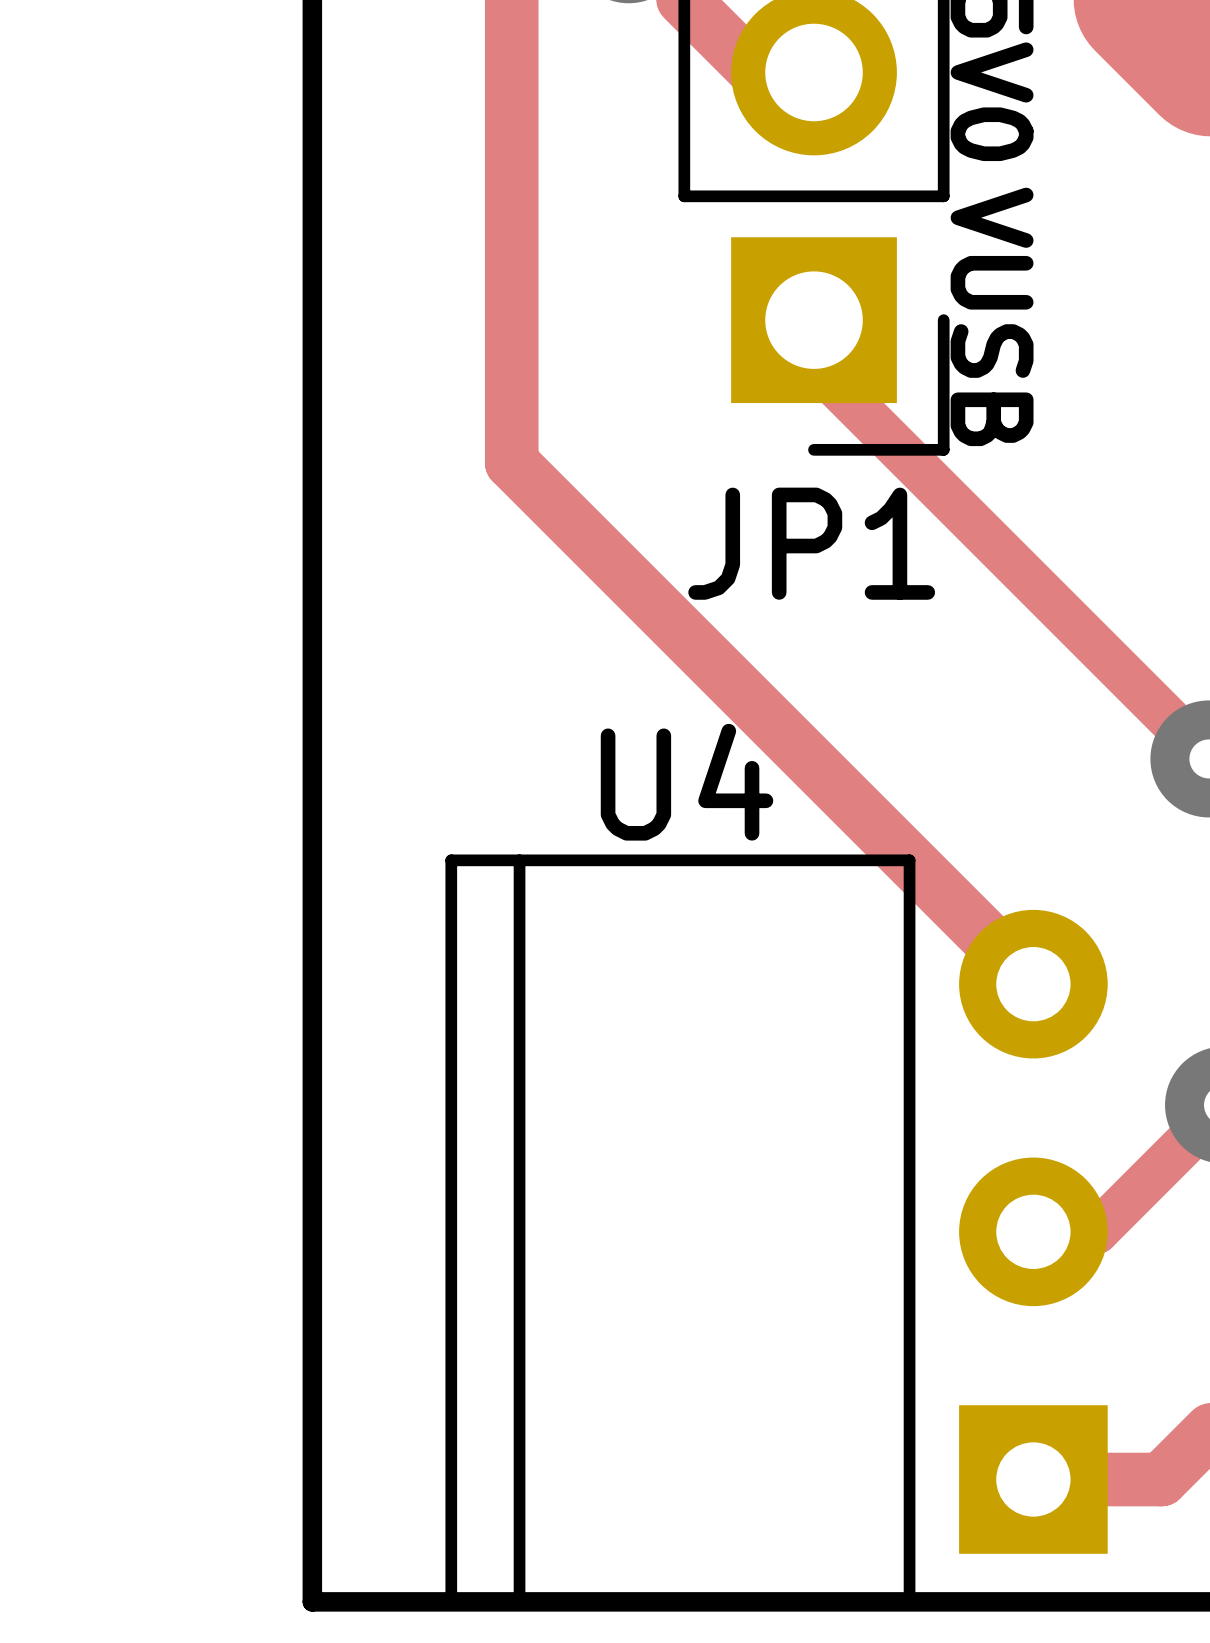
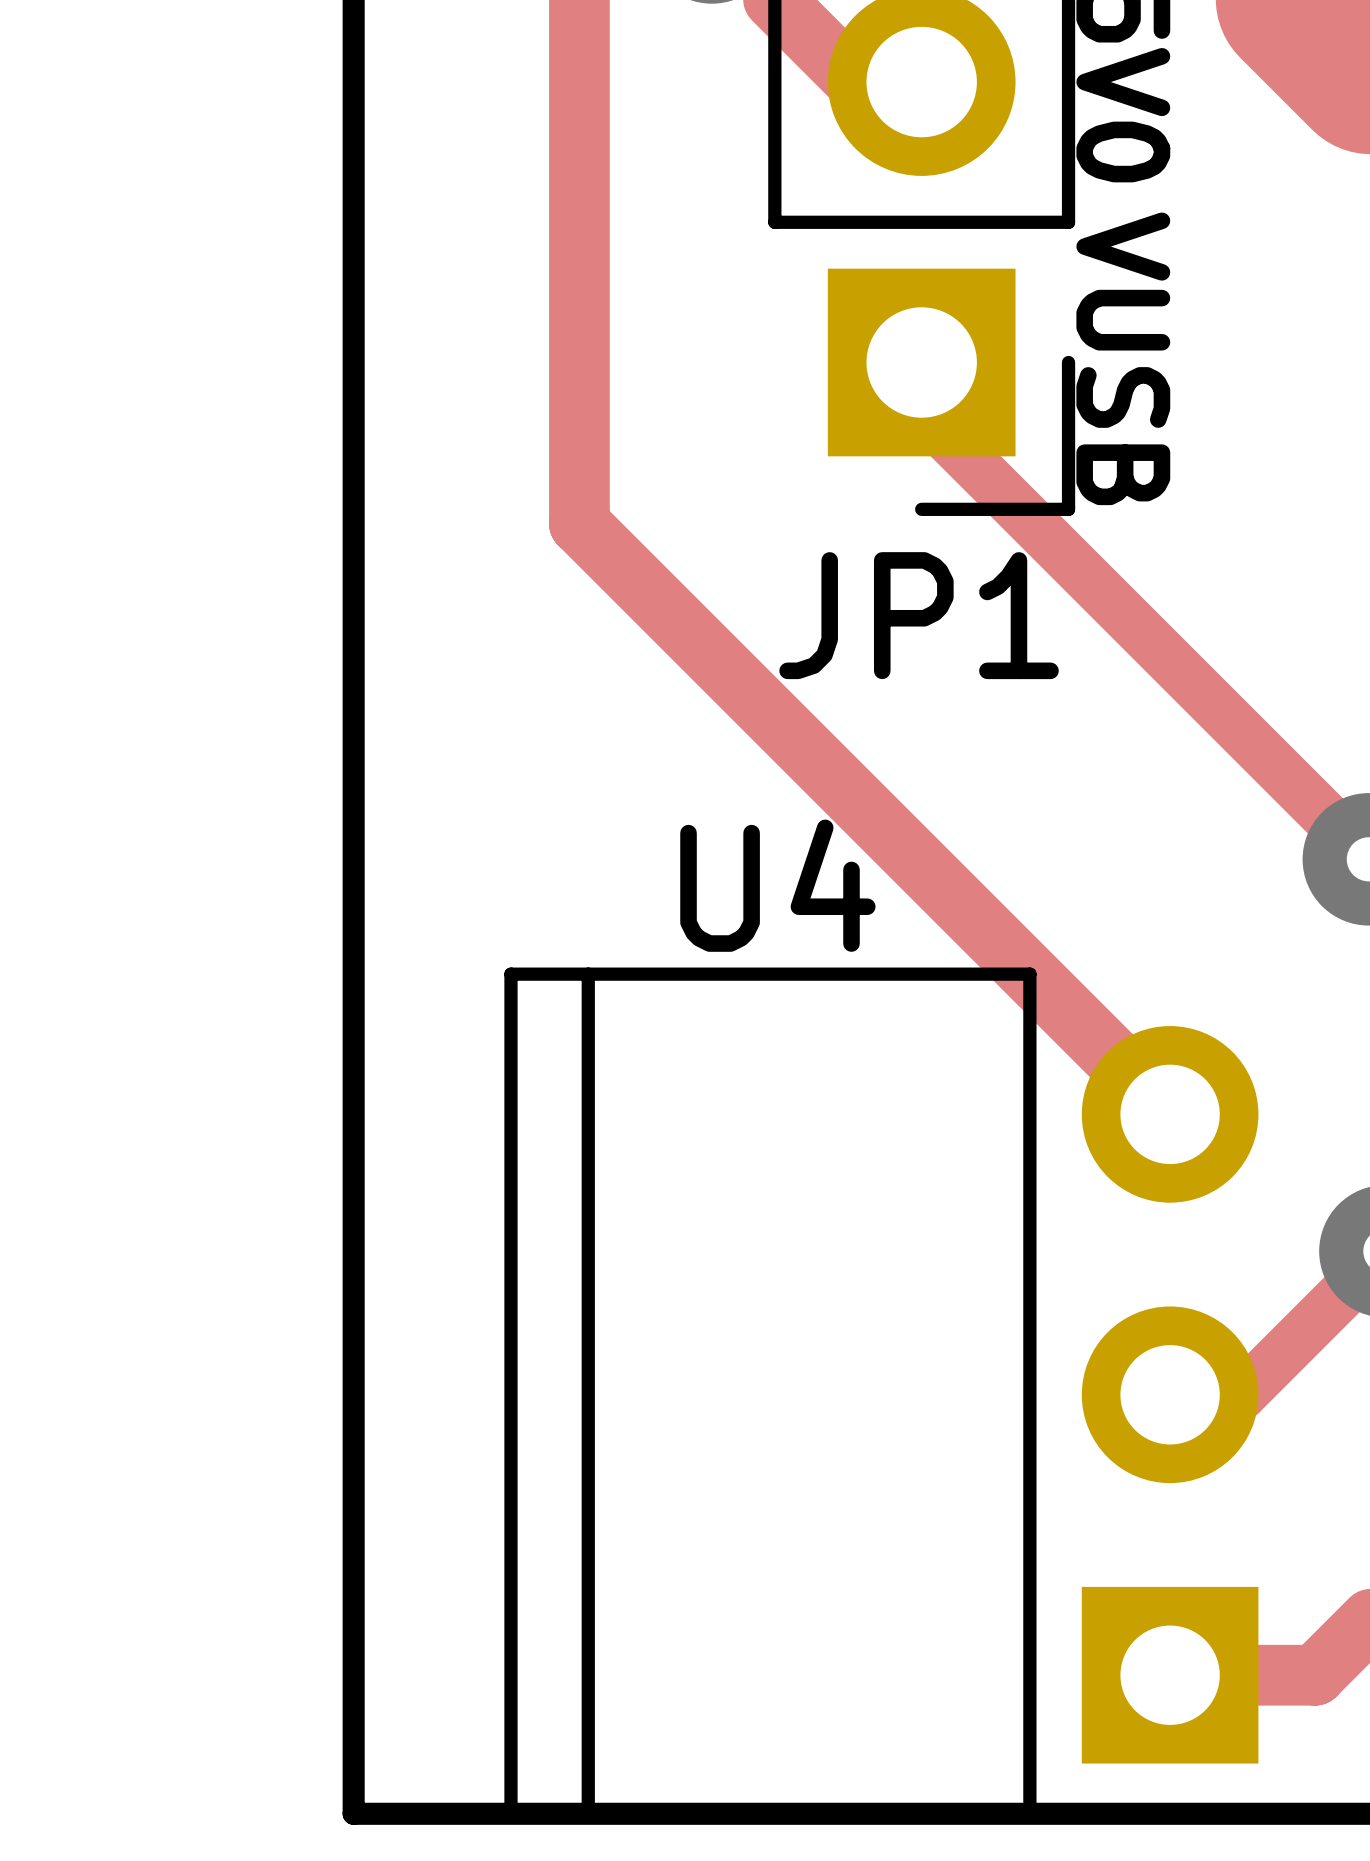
U4 footprint: [445, 854, 1108, 1610] -> [504, 967, 1259, 1823]

